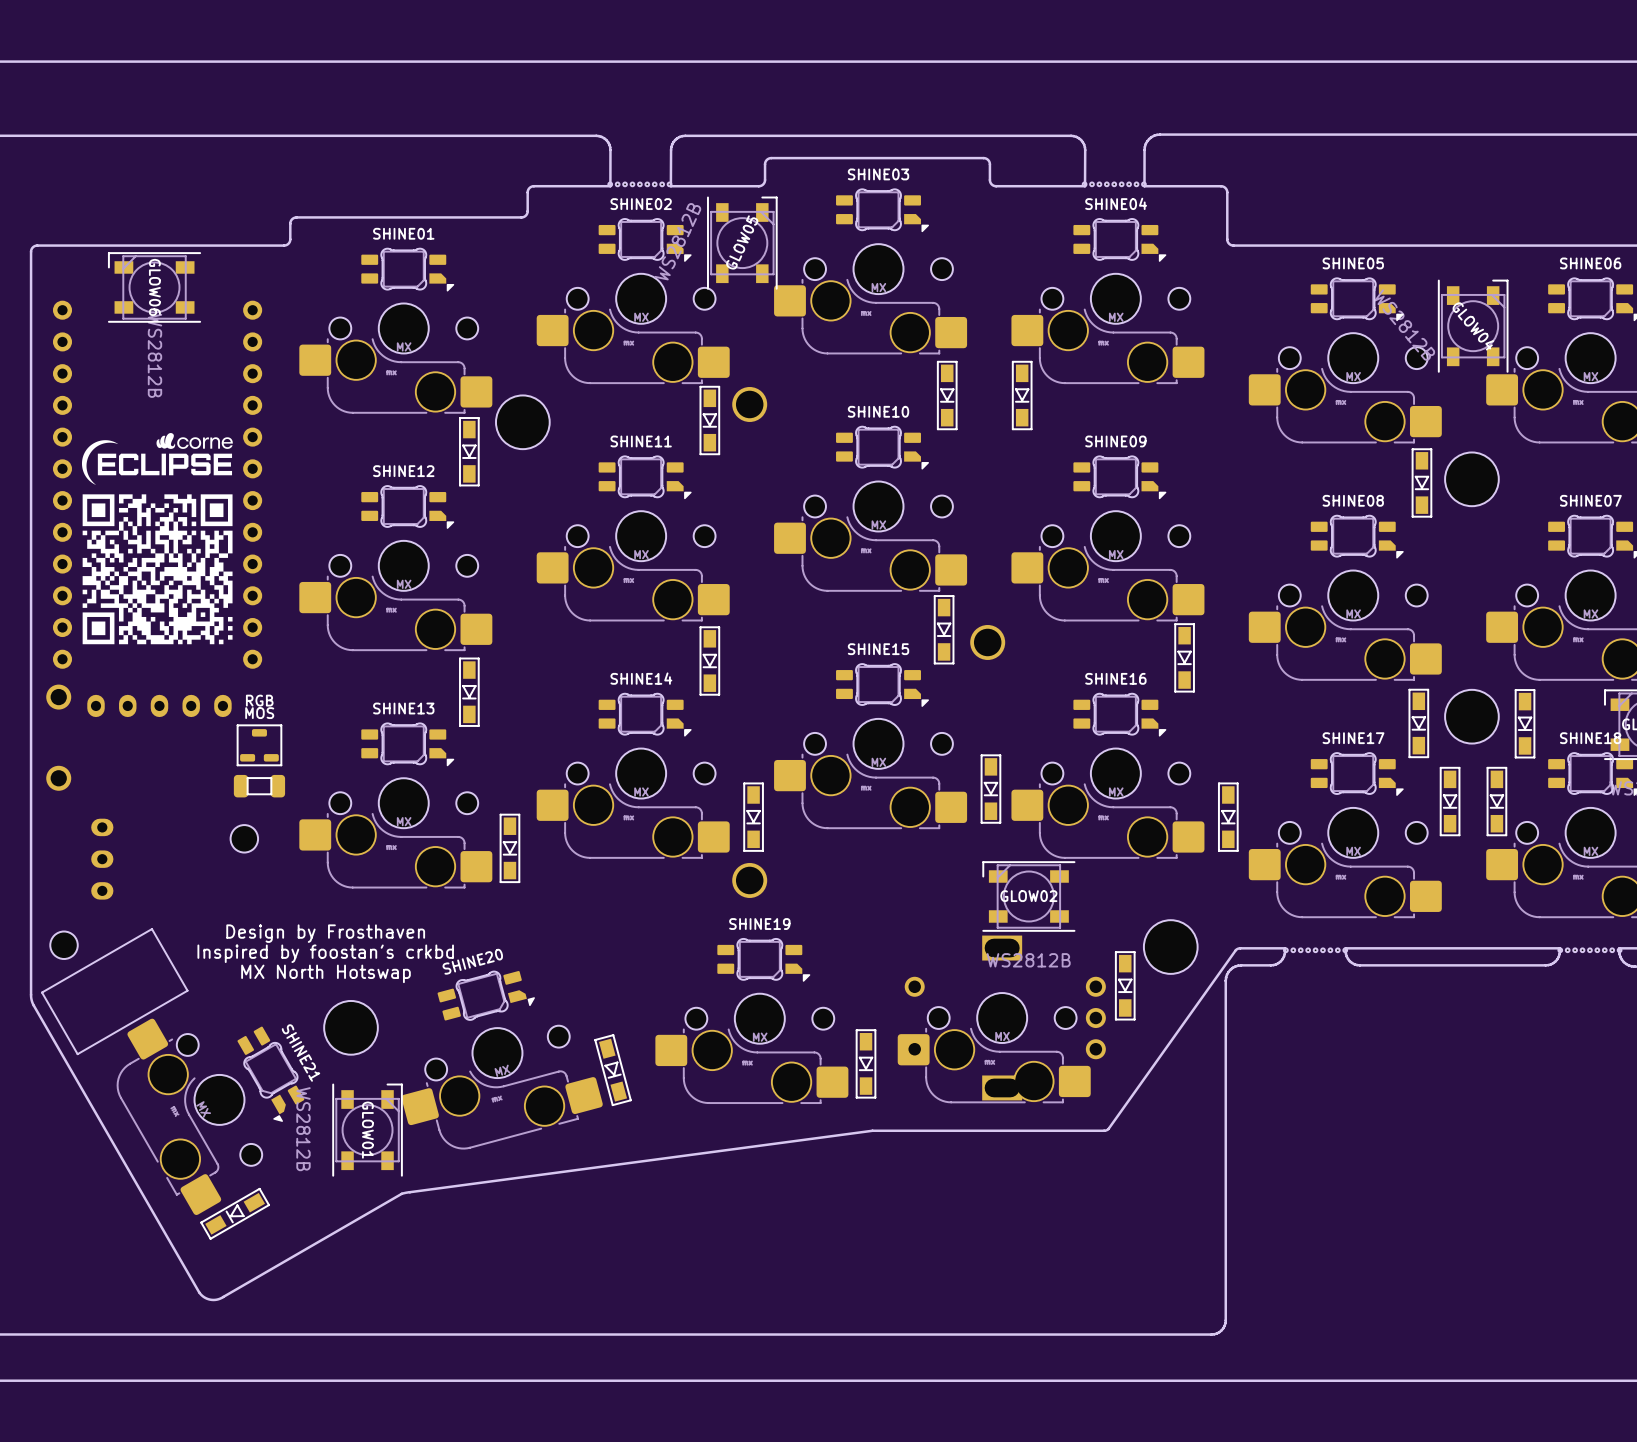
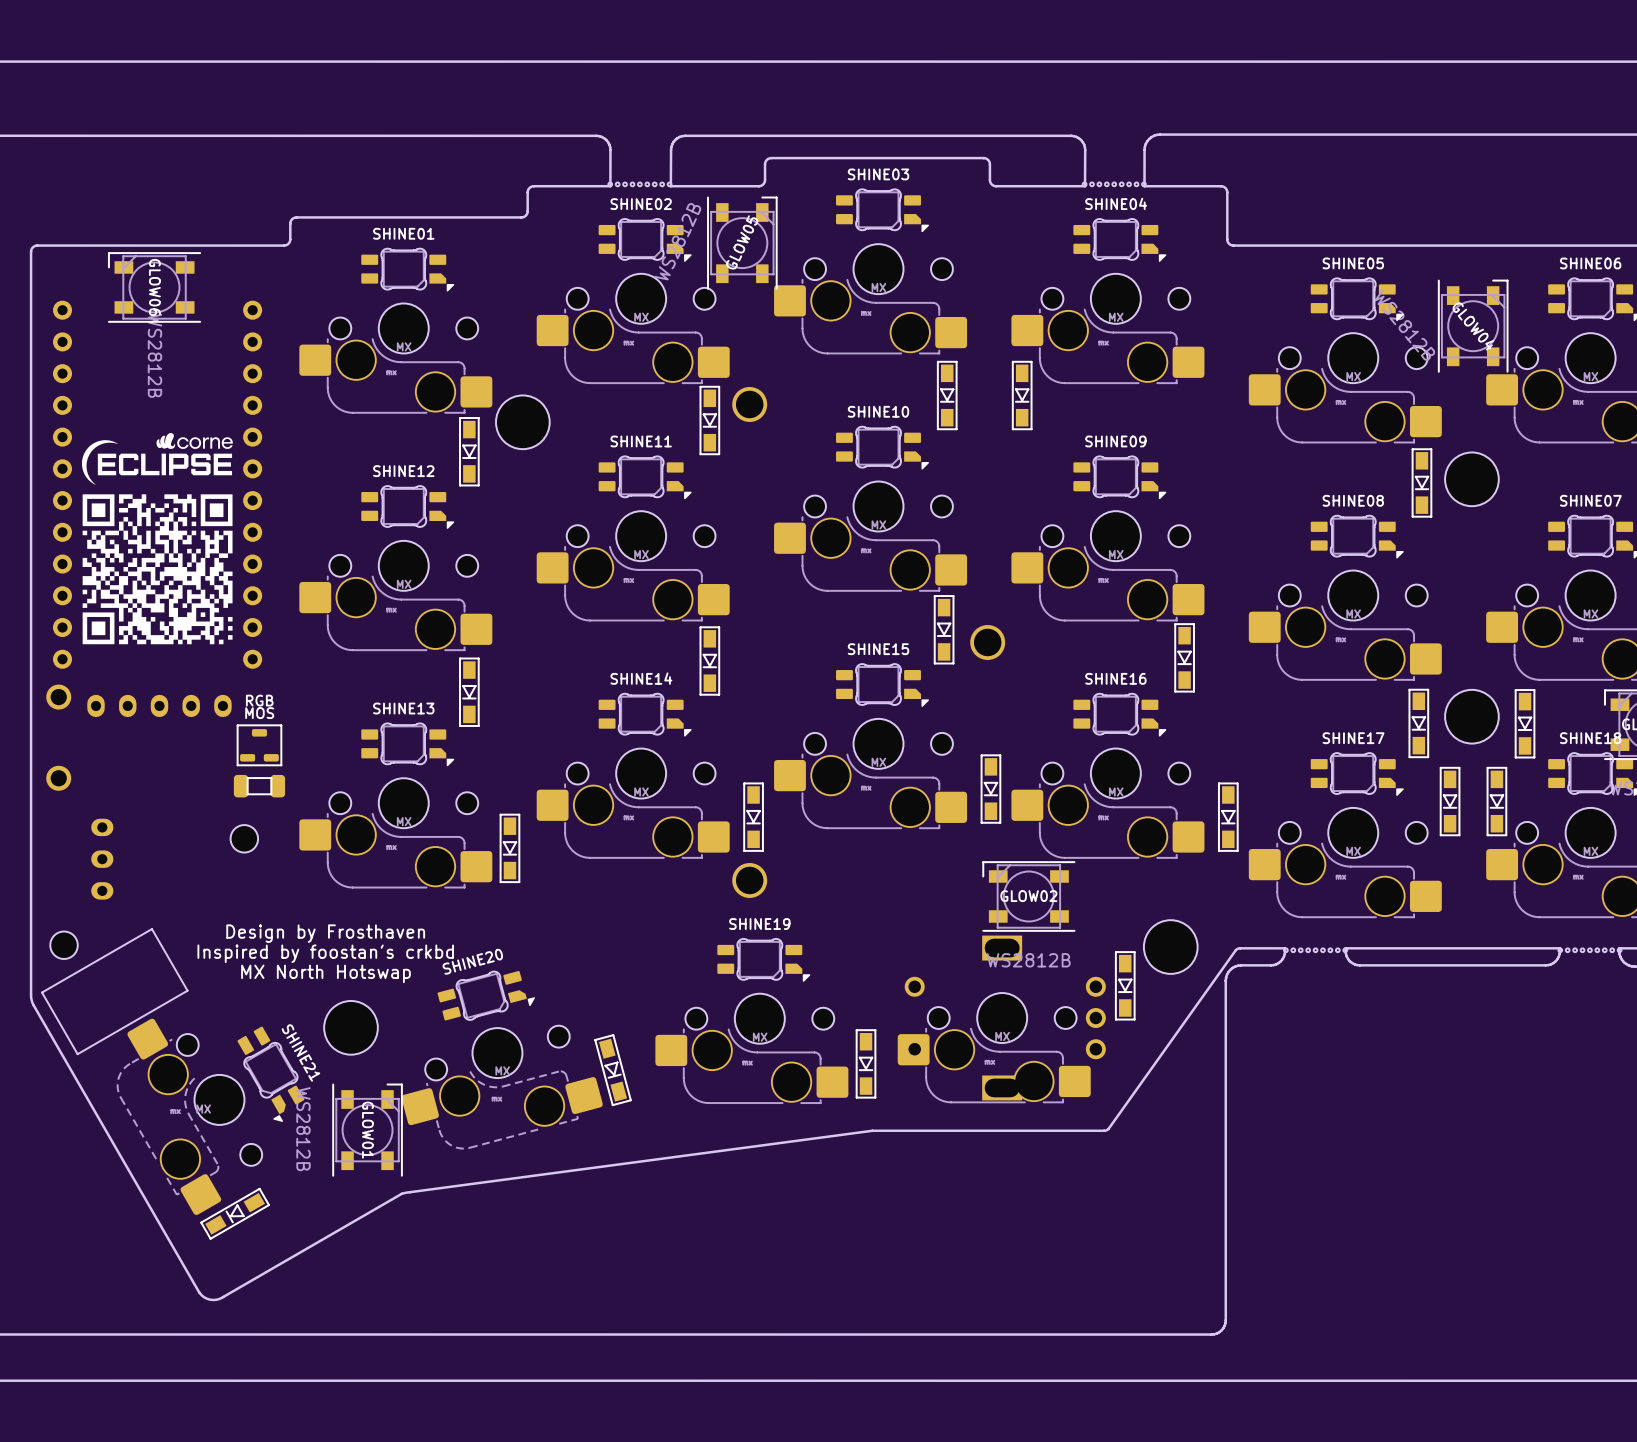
part footprint: [116, 1018, 263, 1216] -> [116, 1018, 263, 1216]
part footprint: [401, 1025, 603, 1150] -> [401, 1025, 603, 1150]

